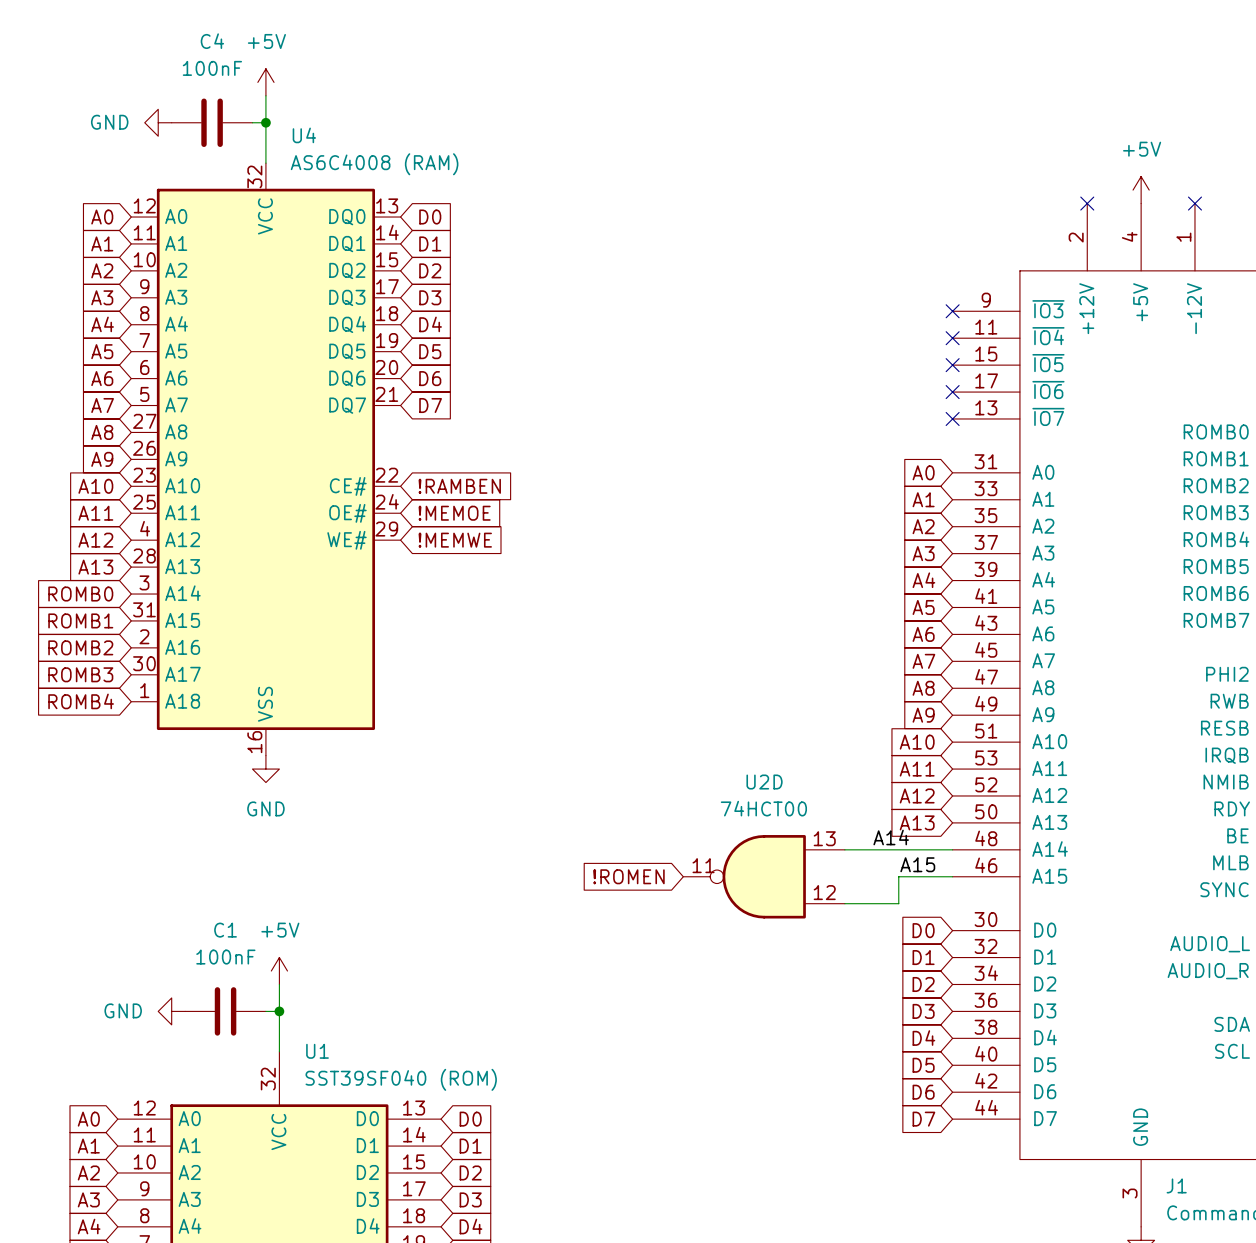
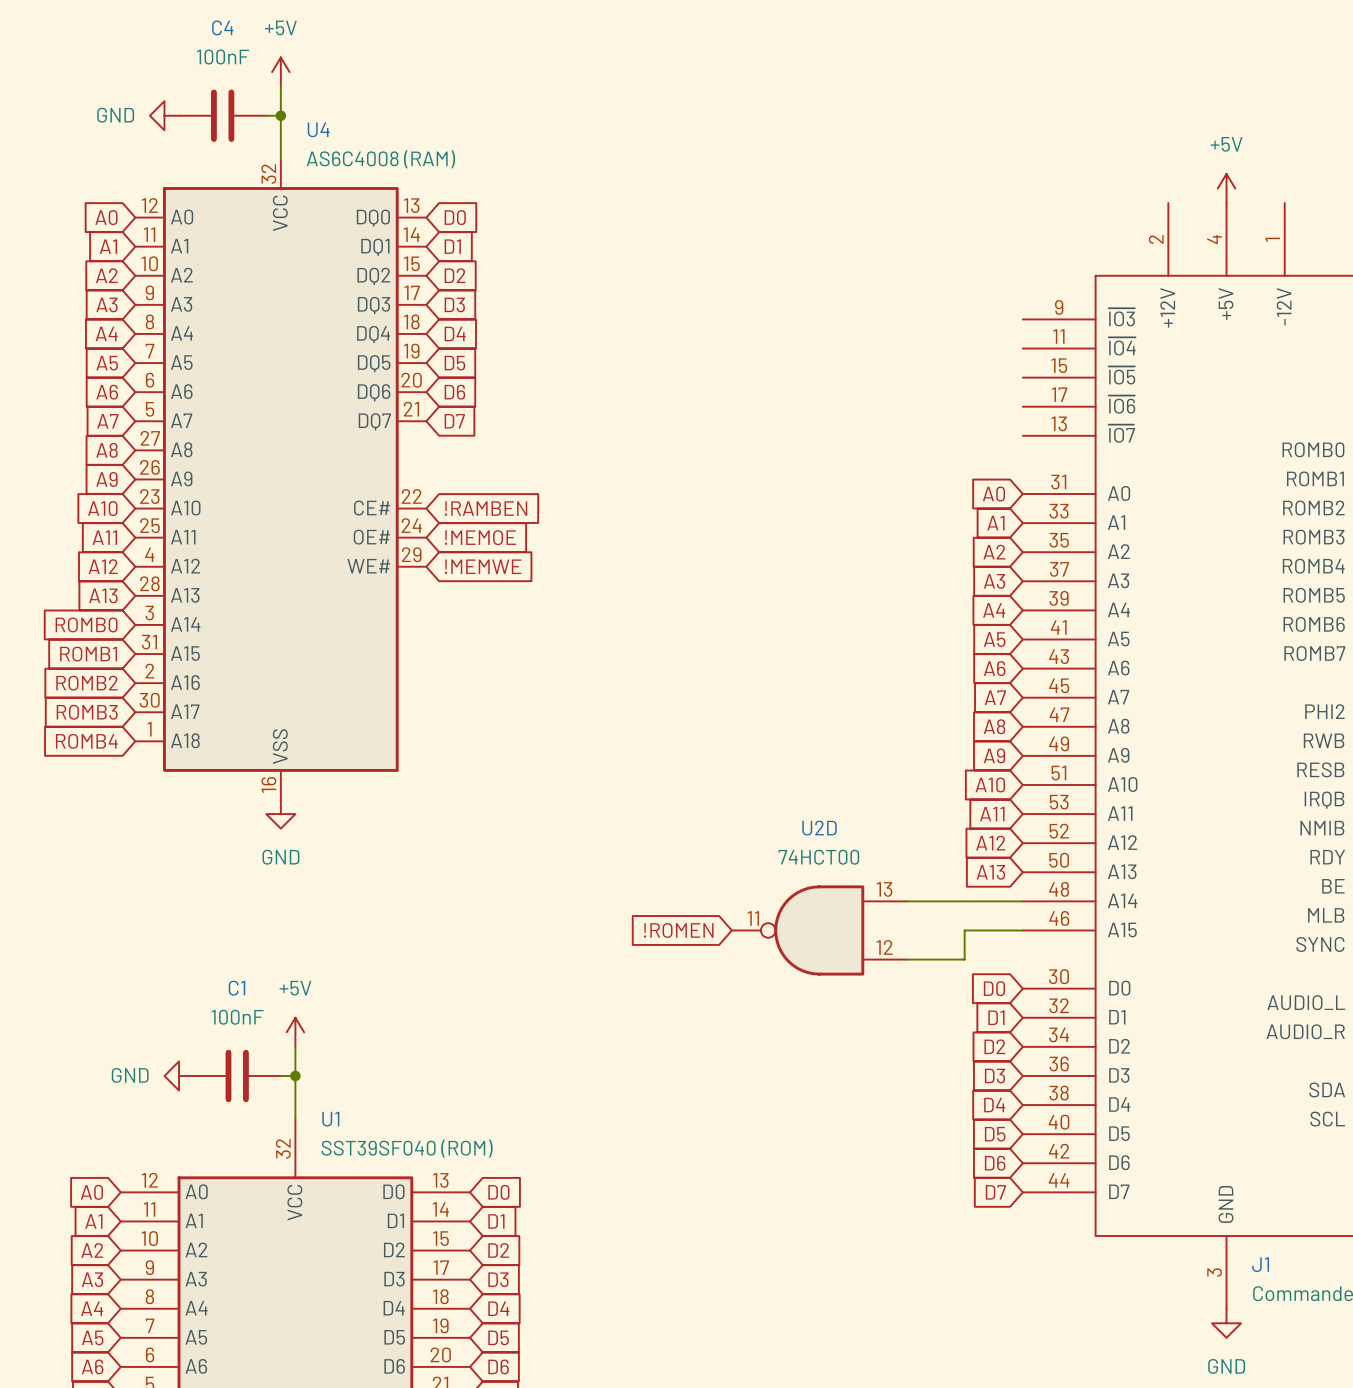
no-connect mark: (1087, 203) -> none
no-connect mark: (1194, 203) -> none
no-connect mark: (952, 311) -> none
no-connect mark: (952, 338) -> none
no-connect mark: (952, 365) -> none
no-connect mark: (952, 392) -> none
no-connect mark: (952, 418) -> none
label: A14 (891, 837) -> none
label: A15 (917, 864) -> none

